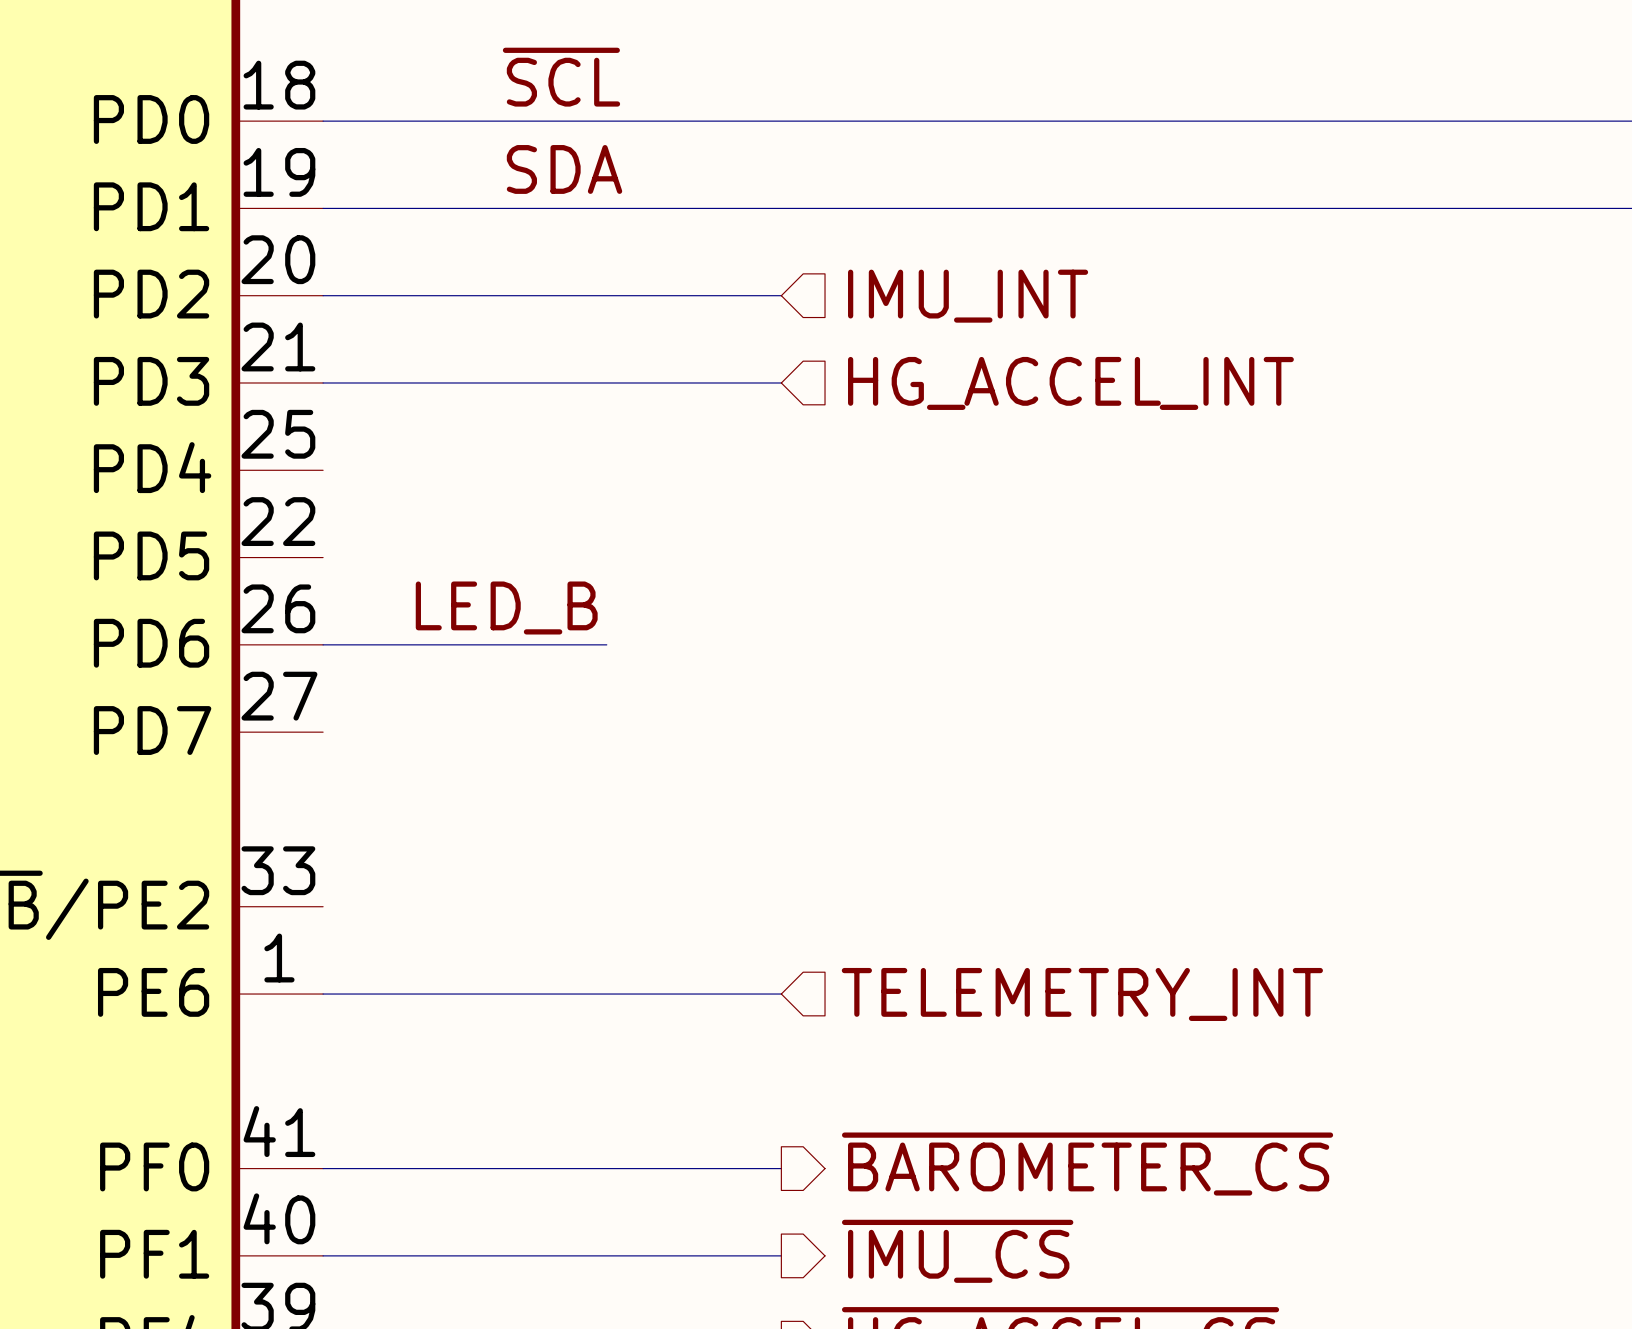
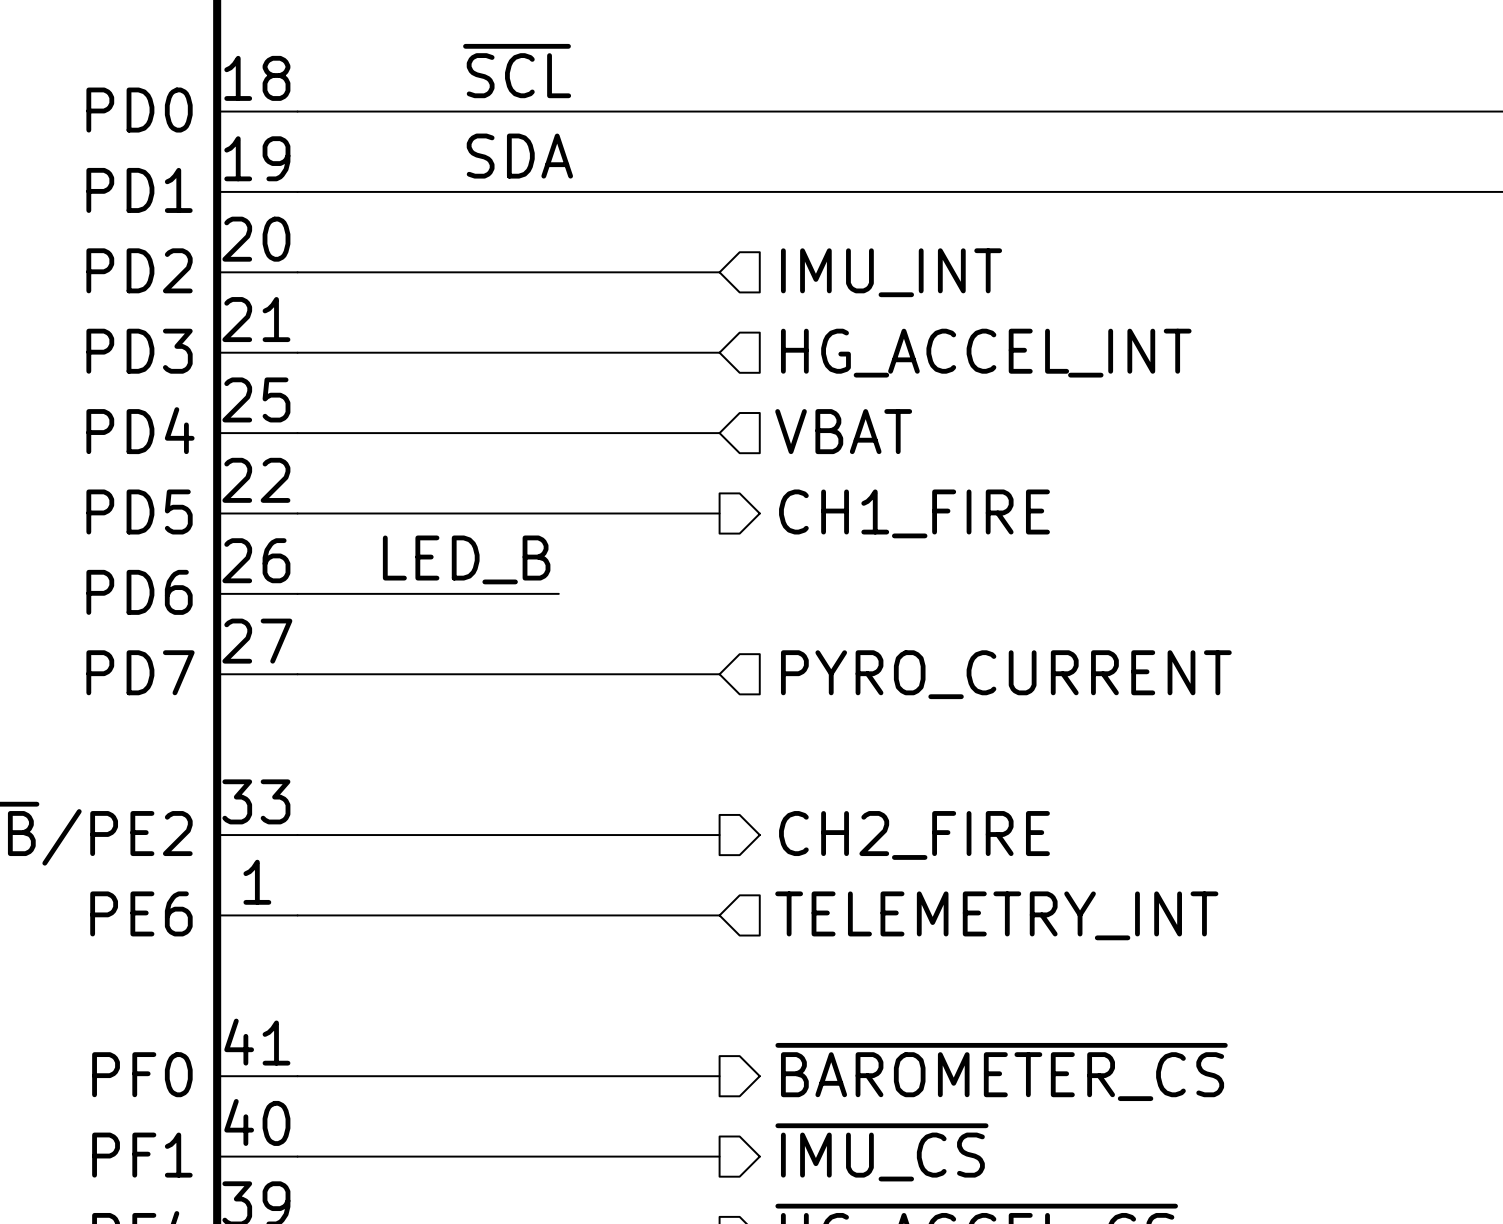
hierarchical label: none -> VBAT (843, 431)
wire: none -> (297, 433) (719, 433)
wire: none -> (297, 513) (719, 513)
hierarchical label: none -> CH1_FIRE (914, 513)
wire: none -> (297, 674) (719, 674)
hierarchical label: none -> PYRO_CURRENT (1006, 674)
wire: none -> (297, 835) (719, 835)
hierarchical label: none -> CH2_FIRE (914, 835)

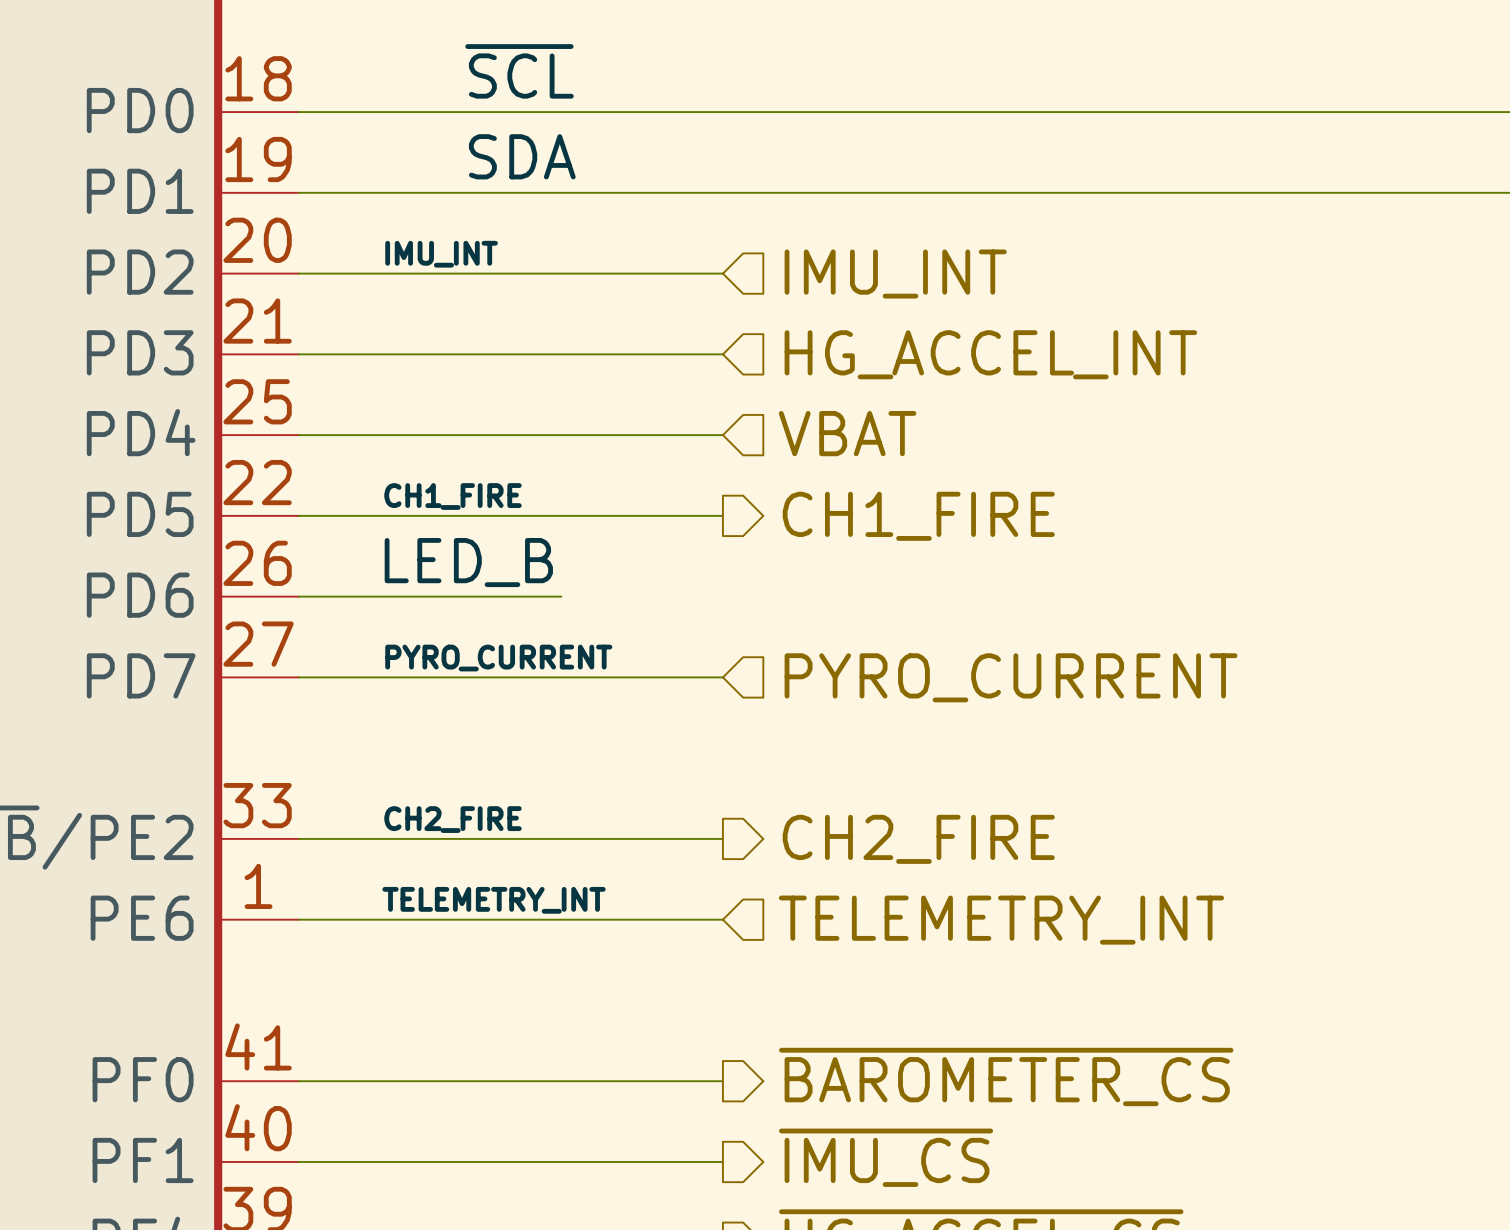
label: none -> IMU_INT (441, 254)
label: none -> CH1_FIRE (453, 496)
label: none -> PYRO_CURRENT (498, 658)
label: none -> CH2_FIRE (453, 819)
label: none -> TELEMETRY_INT (494, 900)

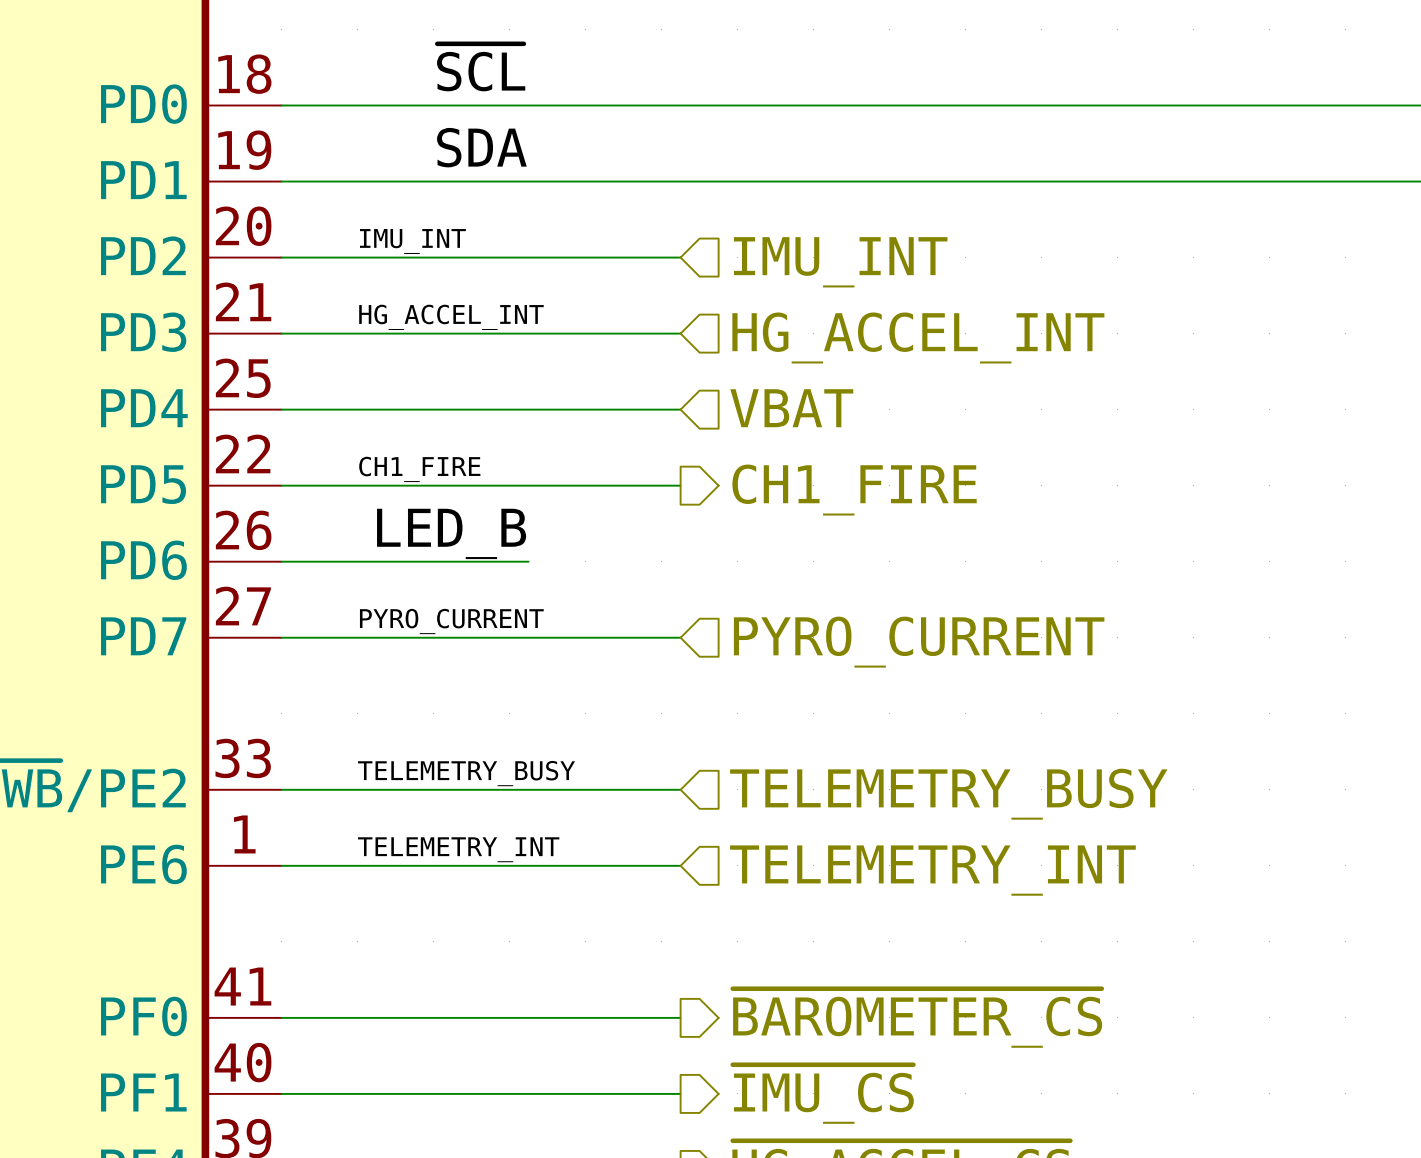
label: none -> HG_ACCEL_INT (451, 317)
label: CH2_FIRE (453, 819) -> TELEMETRY_BUSY (466, 773)
hierarchical label shape: output (918, 839) -> input (948, 794)
hierarchical label: CH2_FIRE (918, 839) -> TELEMETRY_BUSY (948, 794)

